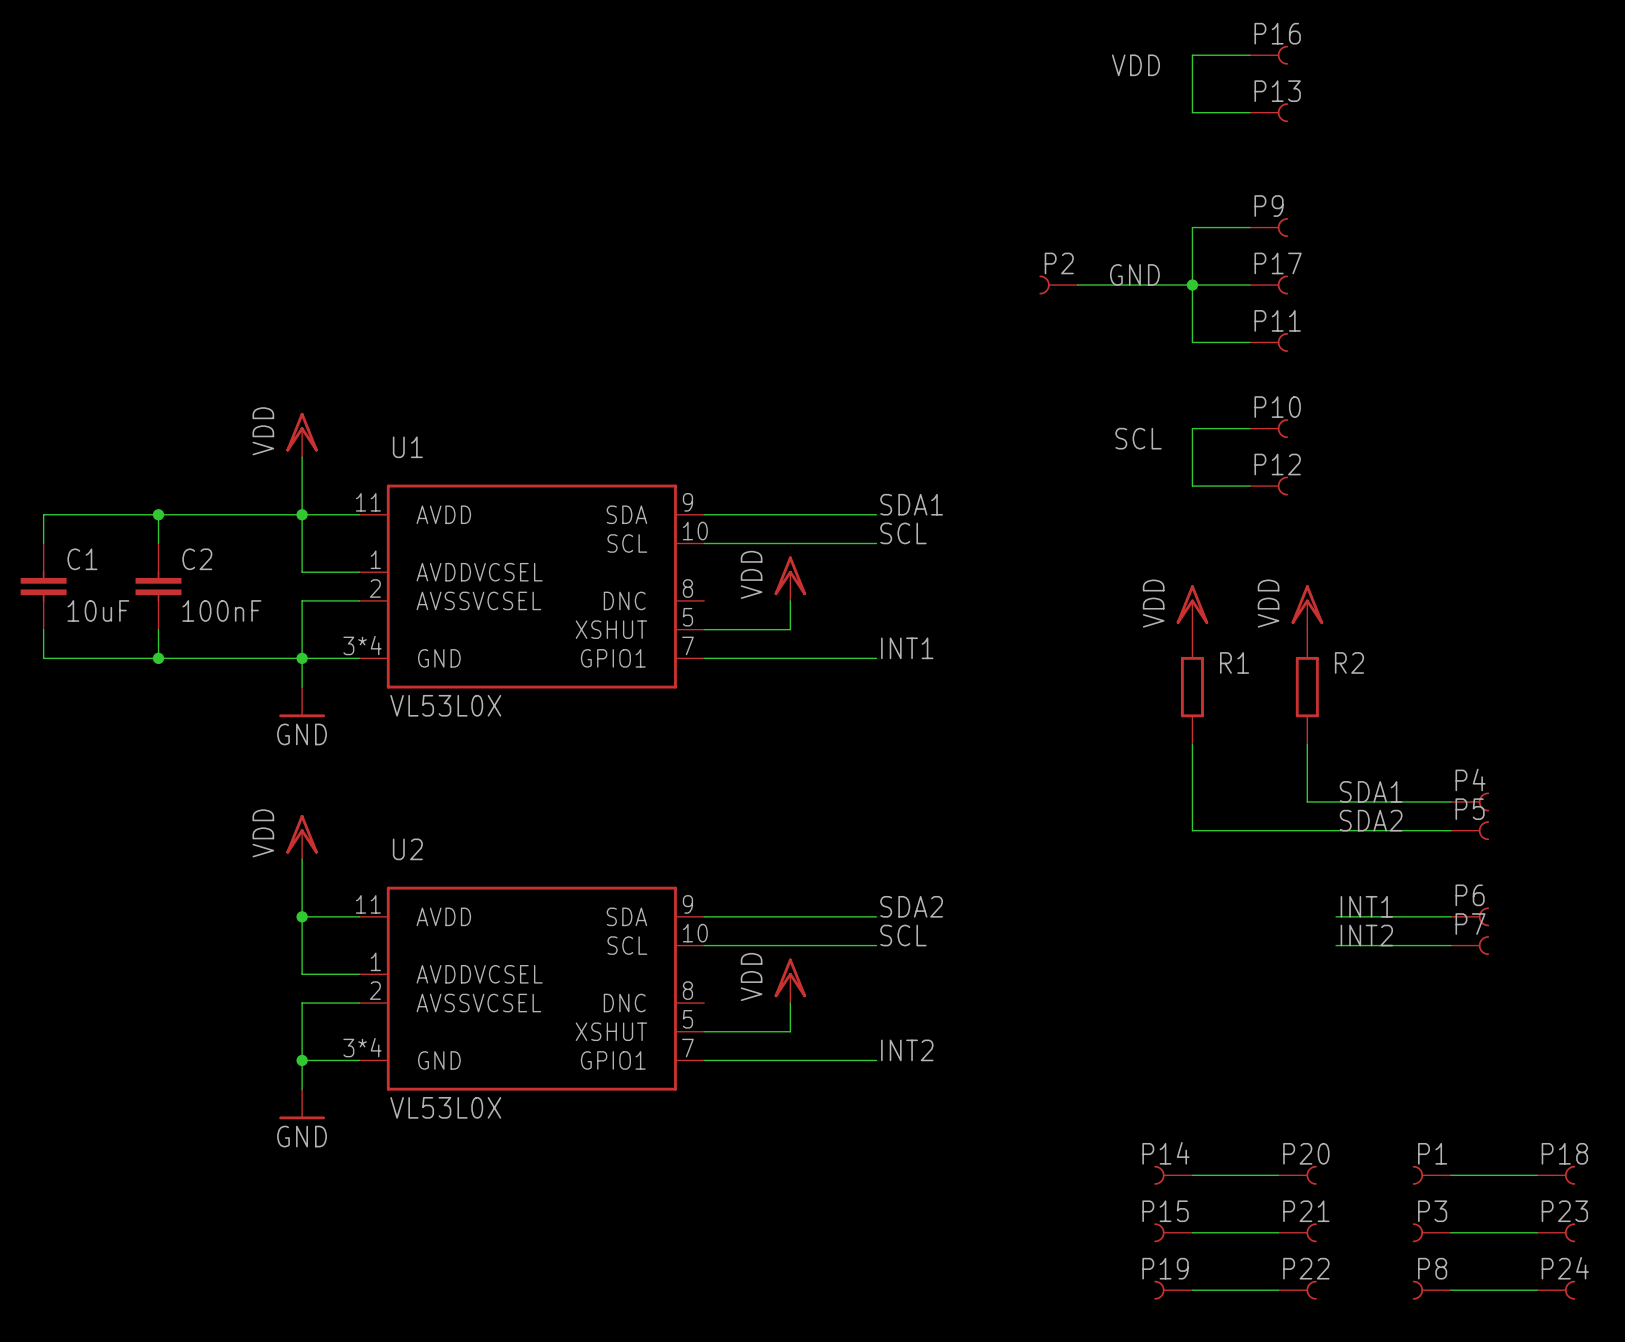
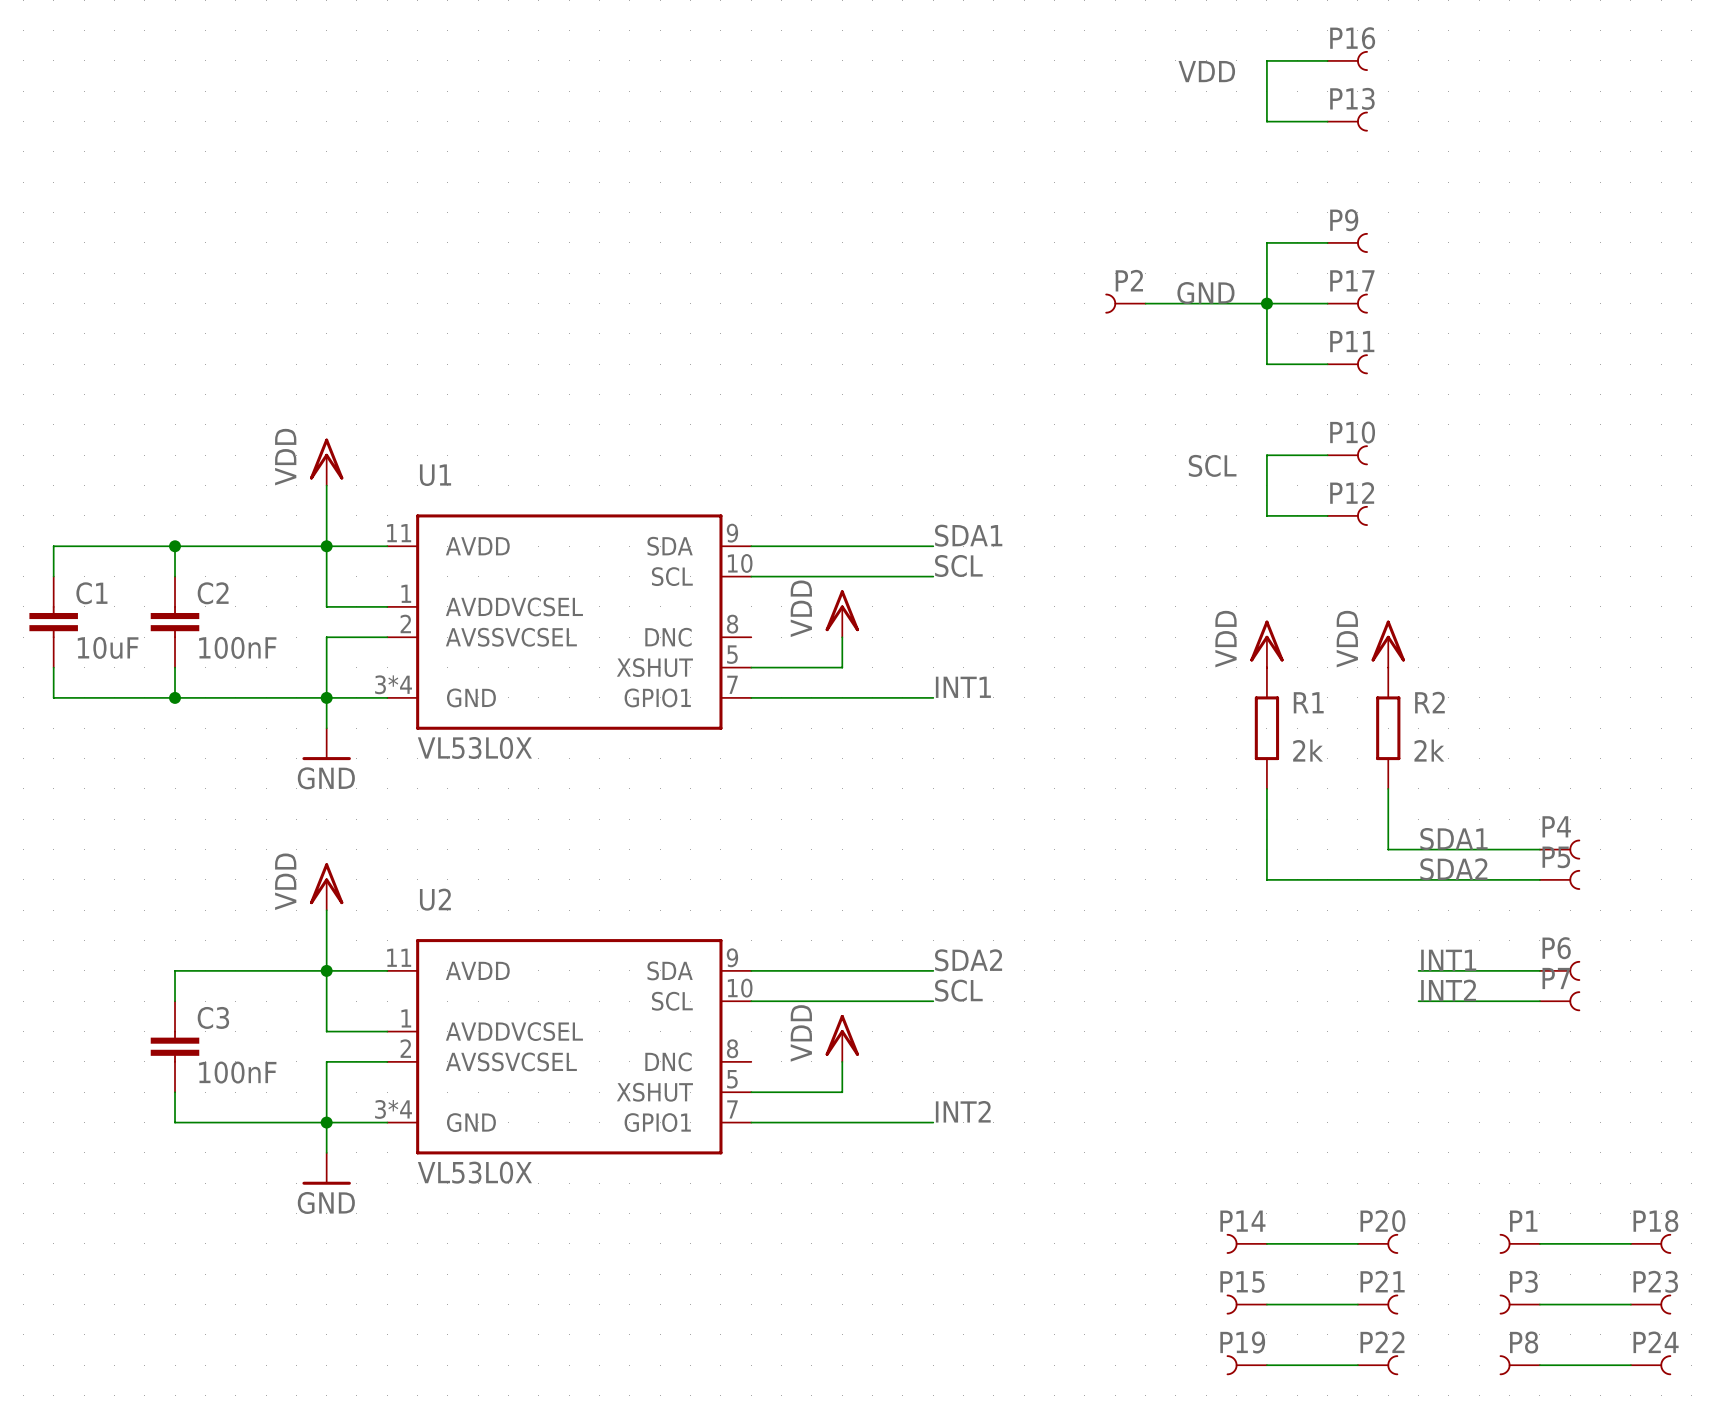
R1 value: none -> 2k (1308, 750)
R2 value: none -> 2k (1429, 750)
wire: none -> (326, 970) (175, 970) (175, 1001)
C3: none -> 100nF (175, 1046)
wire: none -> (175, 1092) (175, 1122) (326, 1122)

